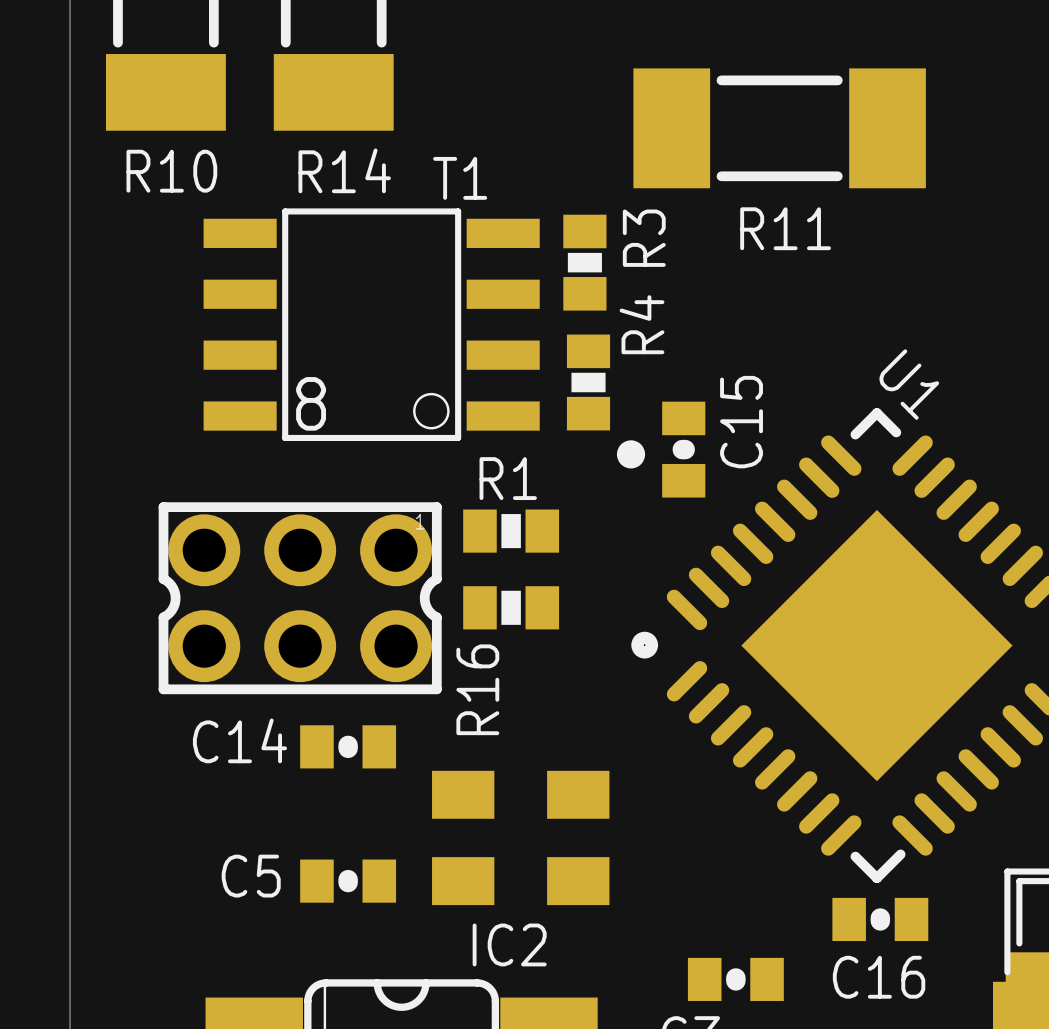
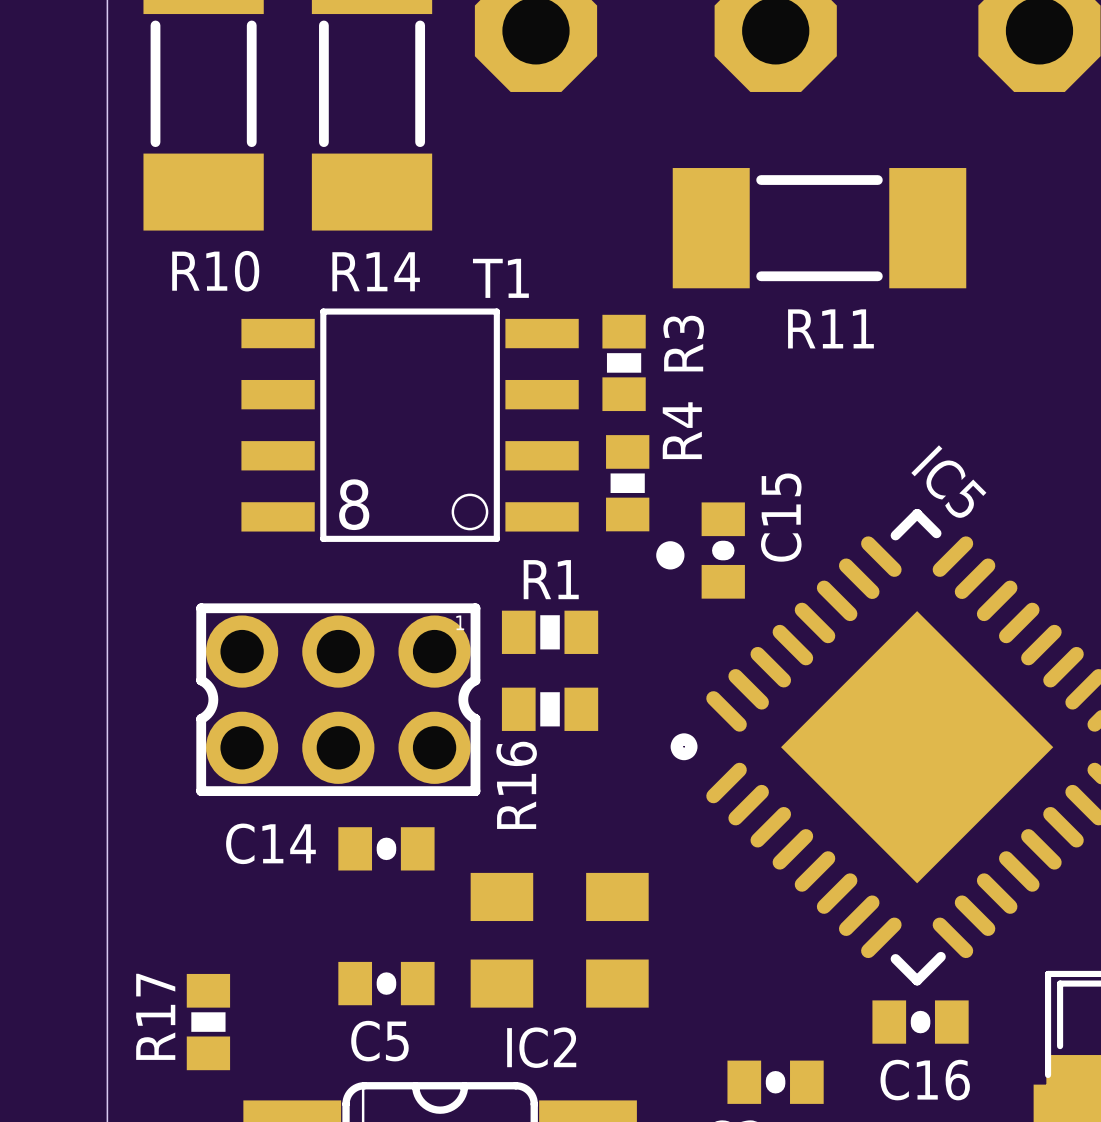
U1 name: U1 (909, 384) -> IC5 (948, 481)
C5 name position: C5 (251, 876) -> C5 (379, 1041)
R17: none -> (208, 1022)

